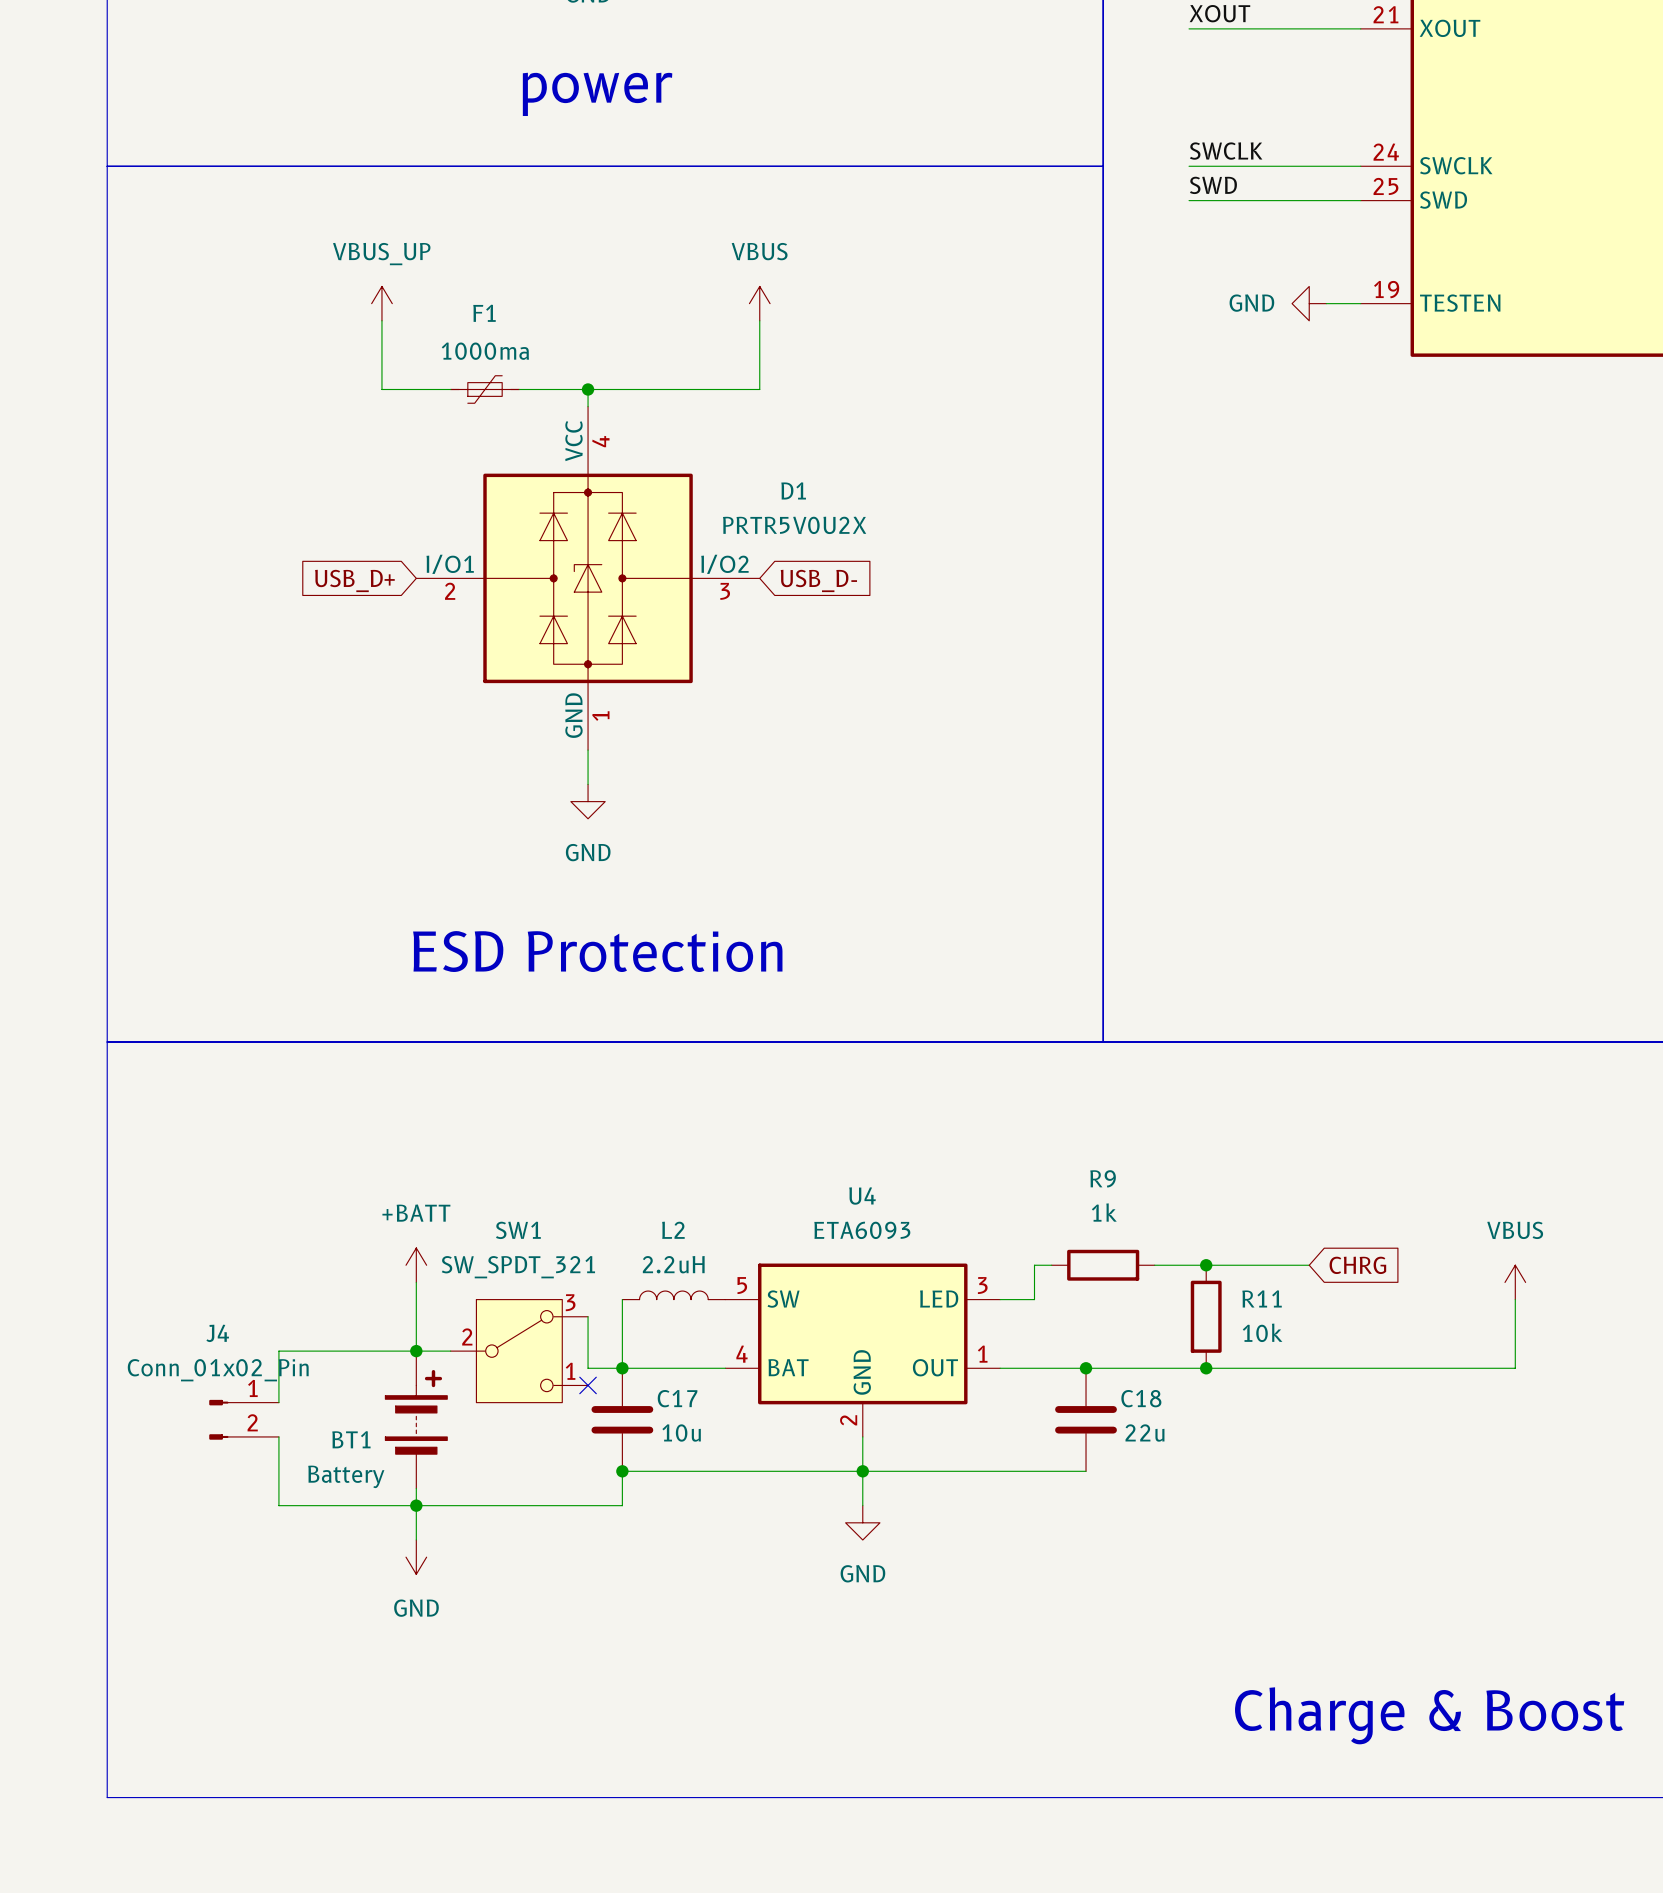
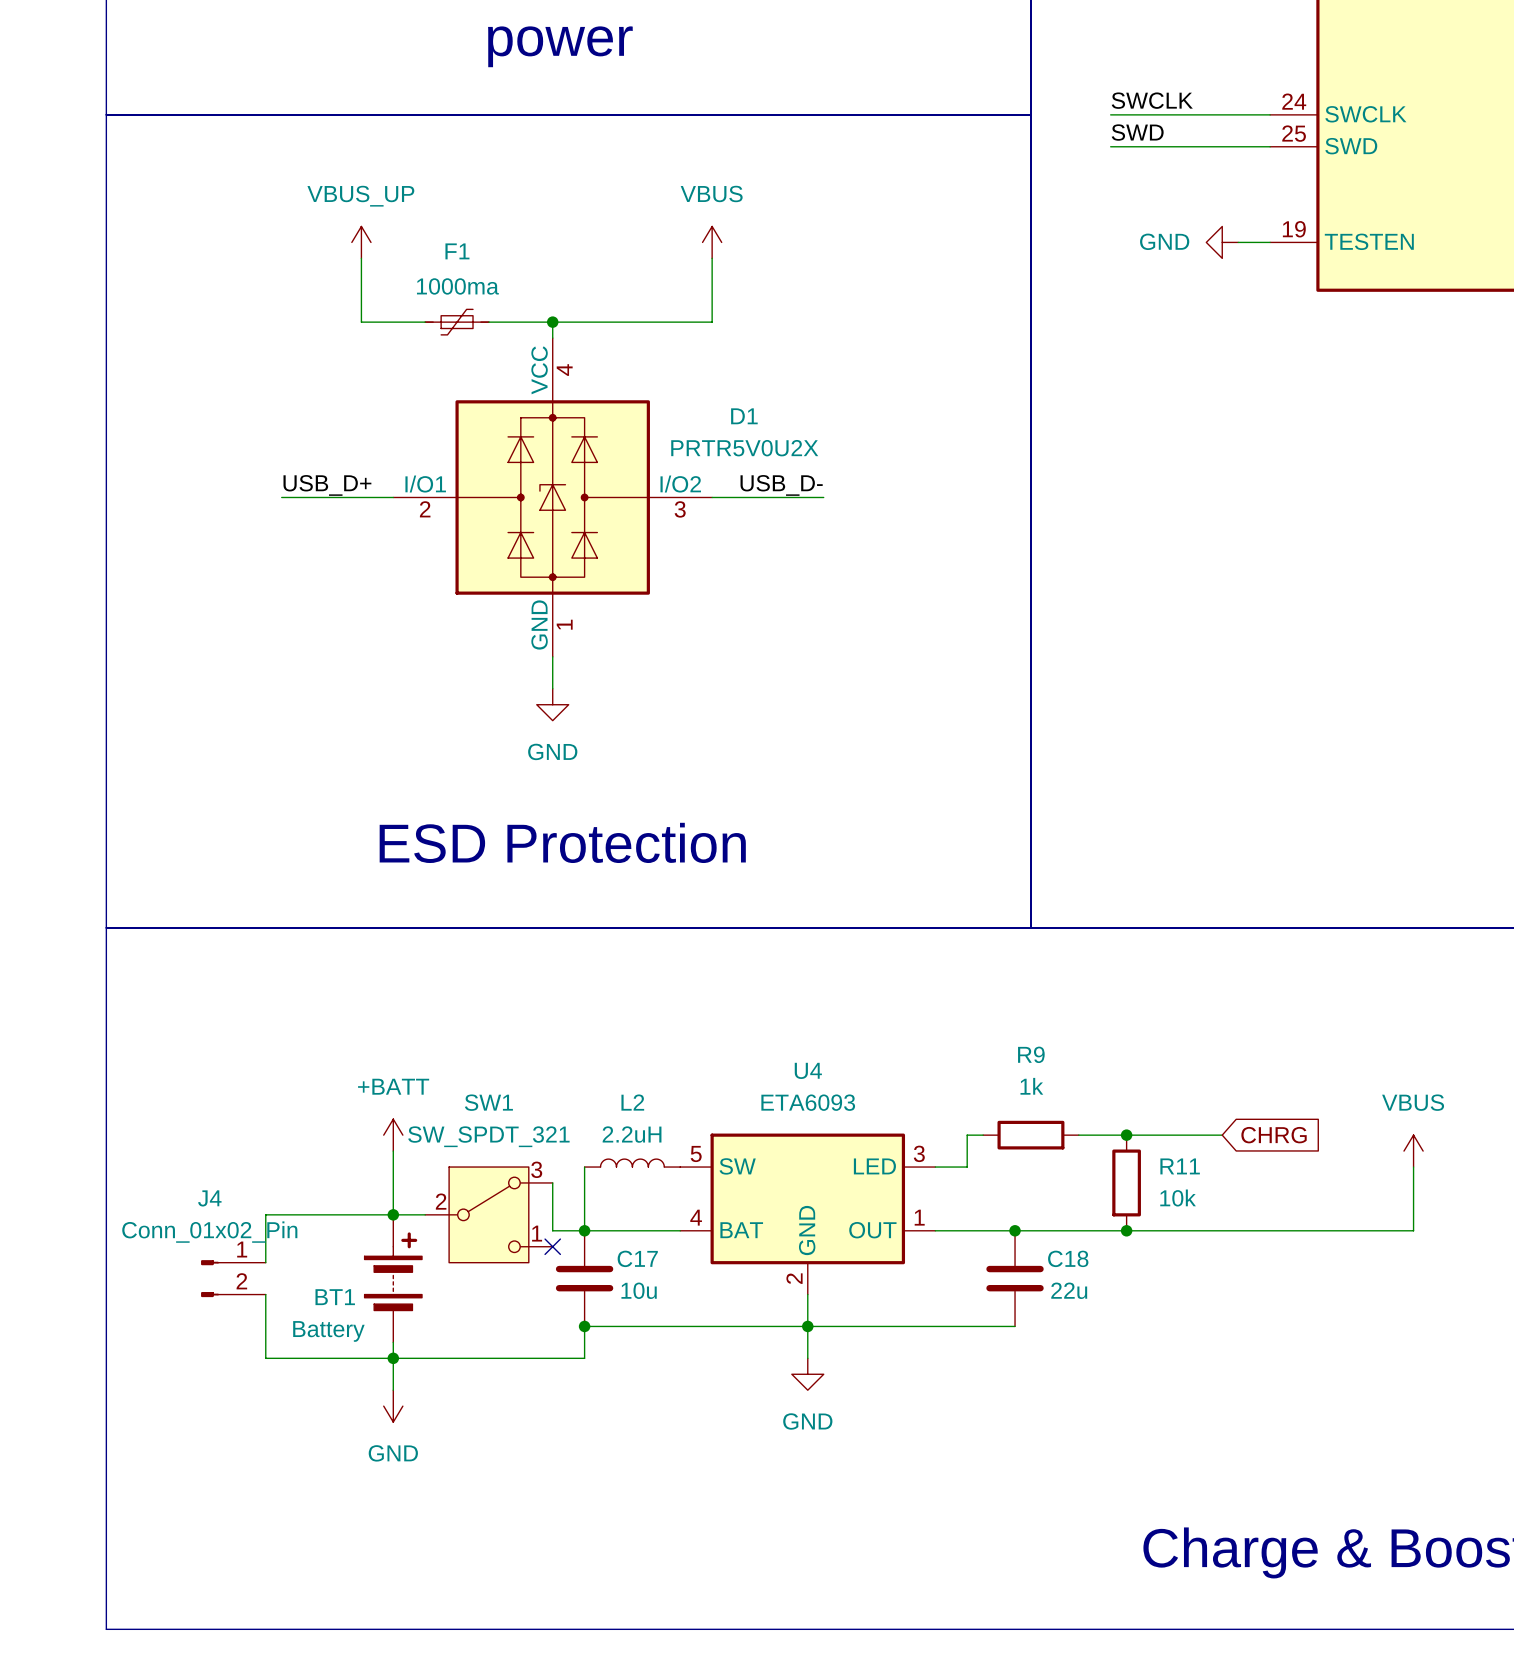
label: none -> USB_D+ (327, 485)
label: none -> USB_D- (781, 485)
wire: none -> (281, 497) (393, 497)
wire: none -> (712, 497) (823, 497)
global label: USB_D+ (354, 580) -> none
global label: USB_D- (818, 580) -> none

